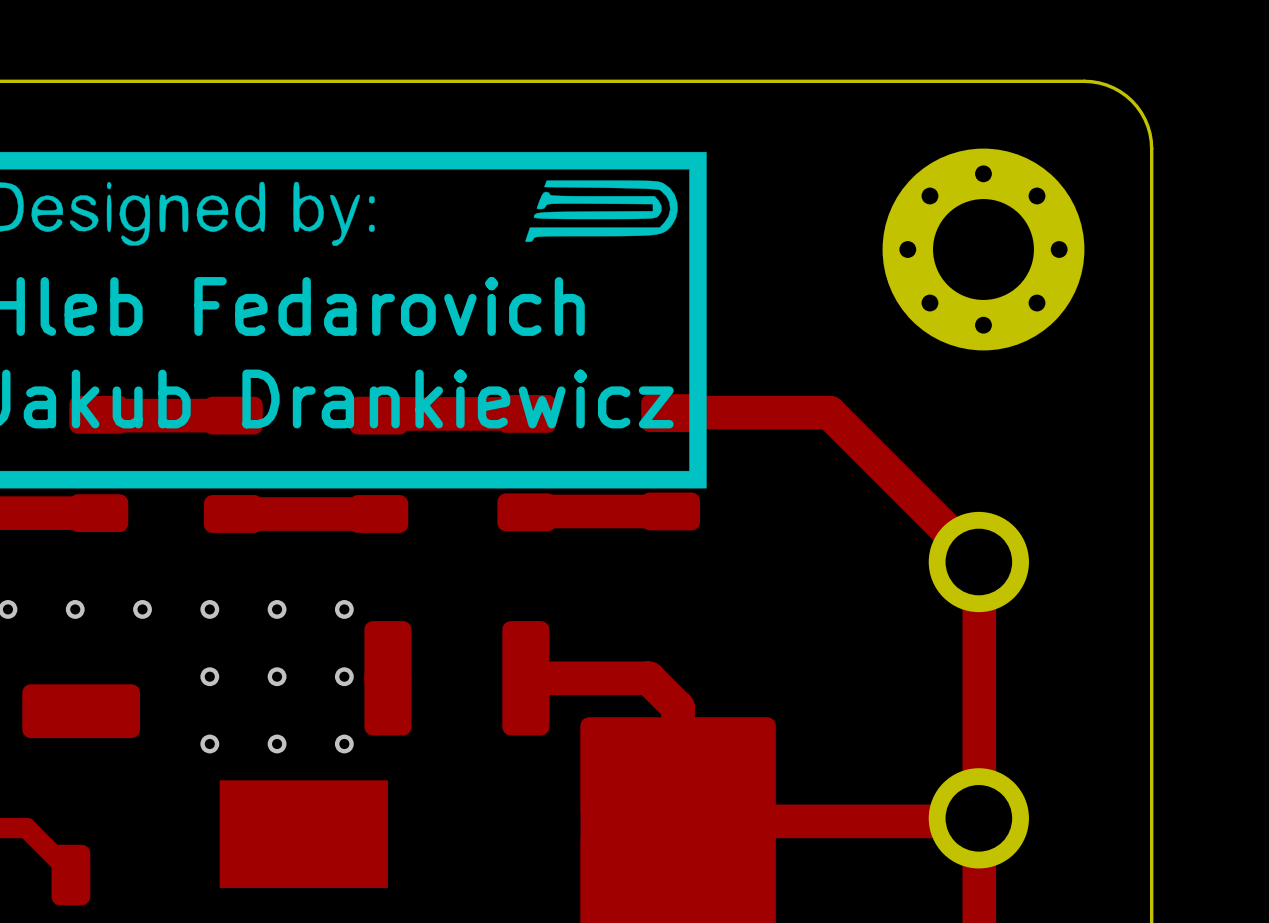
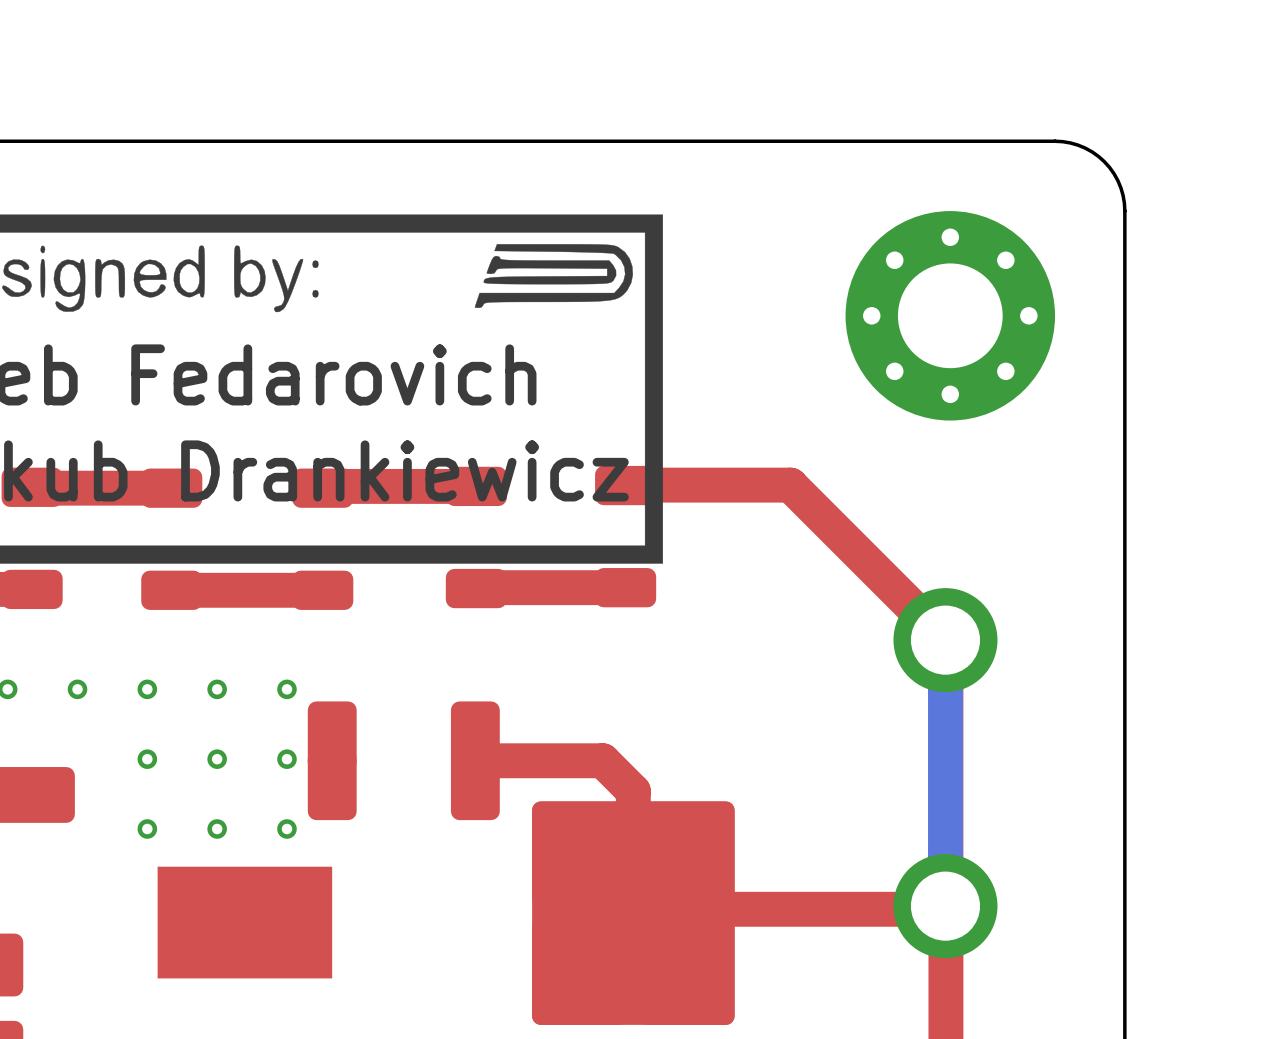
bottom track: none -> (945, 640) (945, 906)

